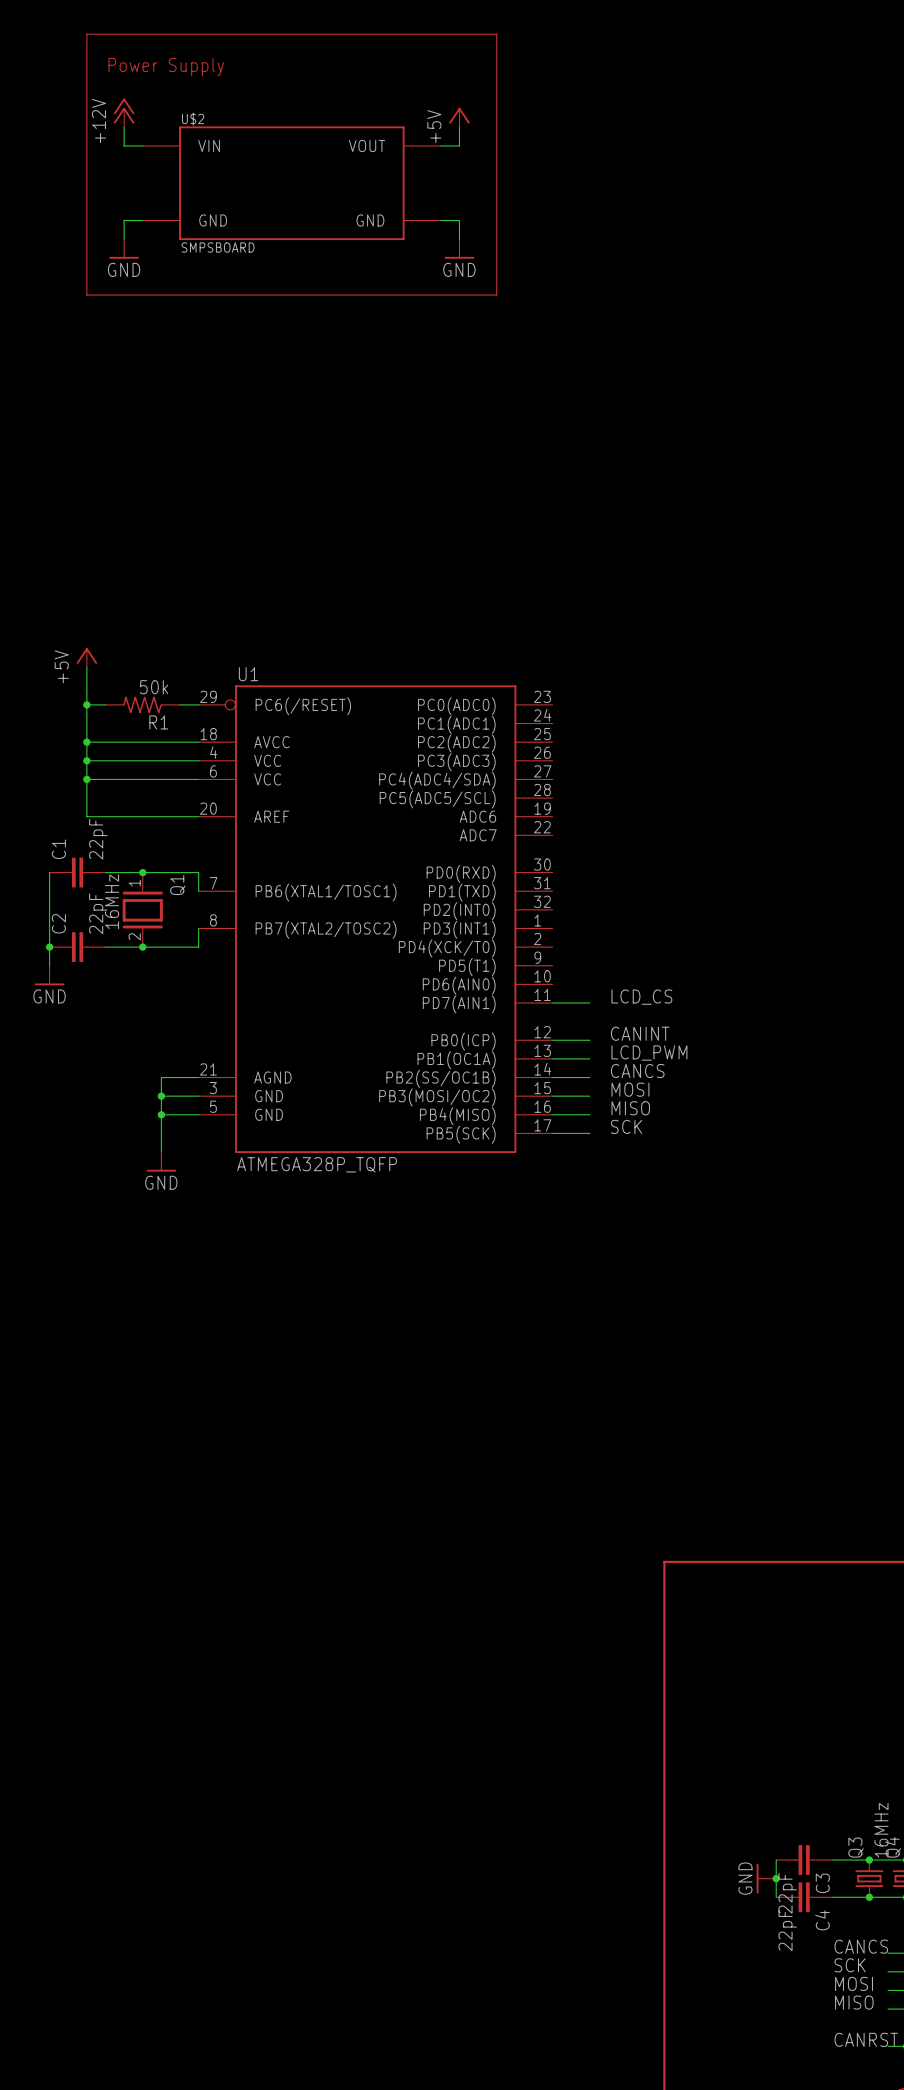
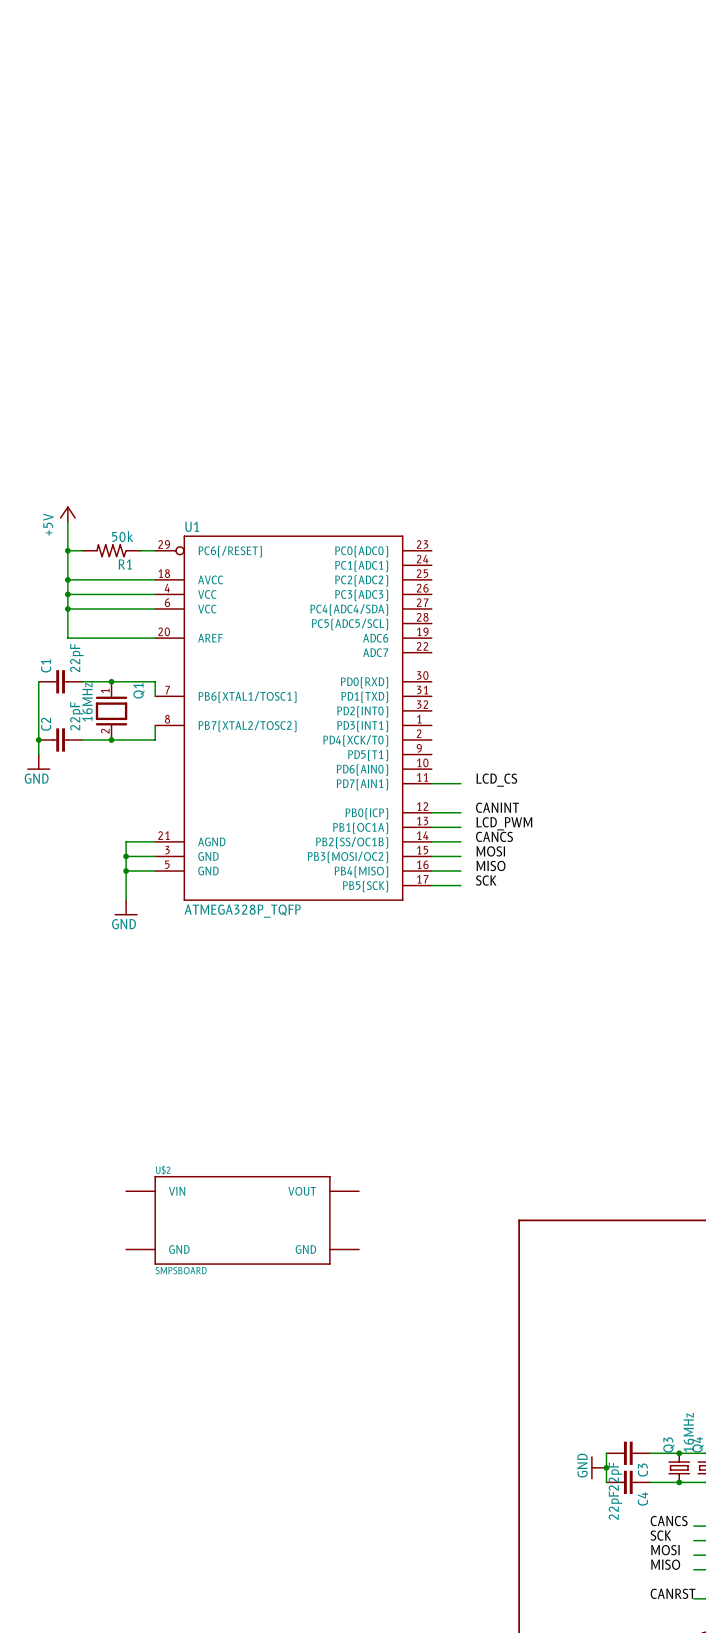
line: (86, 34) (86, 295) (496, 295) (496, 34) (86, 34) -> none
text: Power Supply (166, 67) -> none
power symbol: +12V (124, 112) -> none
power symbol: +5V (459, 117) -> none
wire: (124, 127) (124, 145) (142, 145) -> none
wire: (459, 127) (459, 145) (440, 145) -> none
U$2 position: (291, 183) -> (242, 1220)
wire: (142, 220) (124, 220) (124, 239) -> none
wire: (440, 220) (459, 220) (459, 239) -> none
power symbol: GND (124, 248) -> none
power symbol: GND (459, 248) -> none

